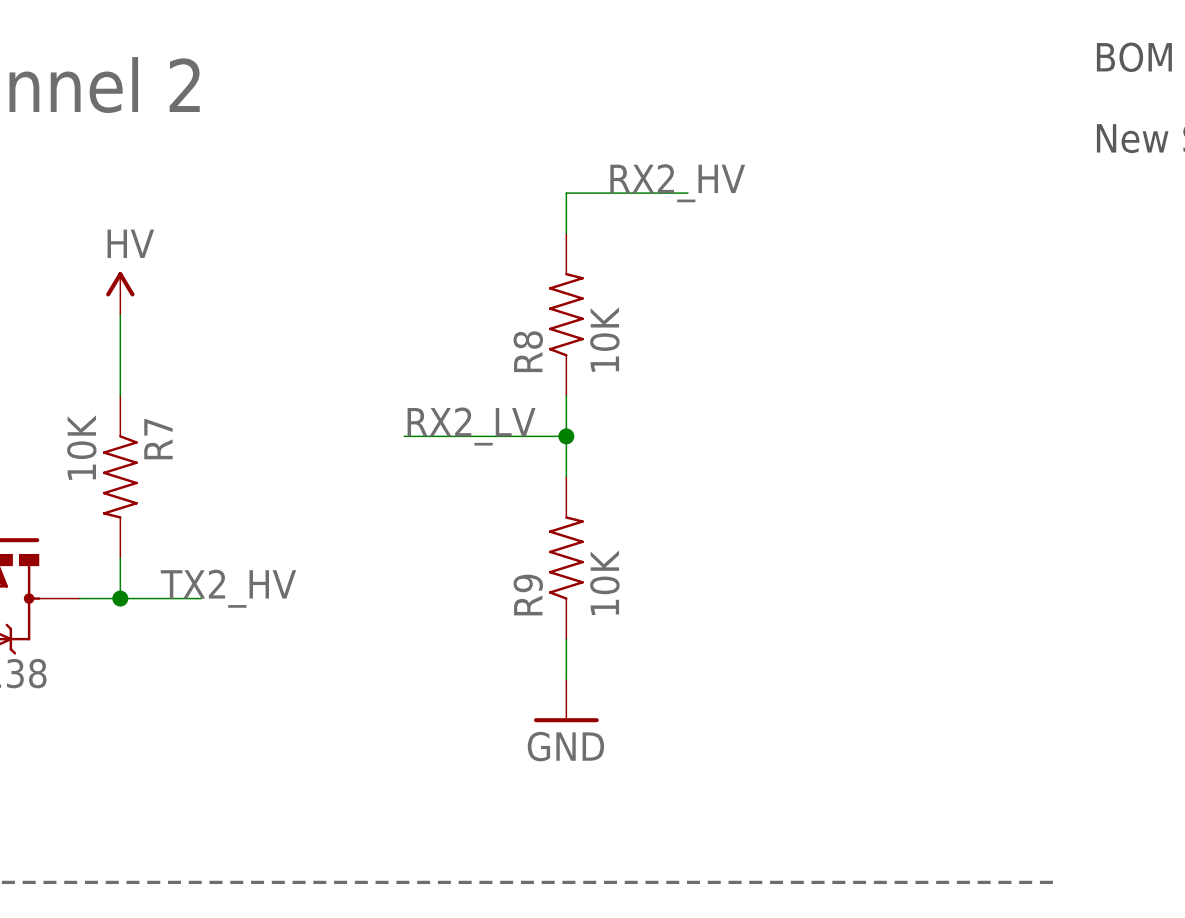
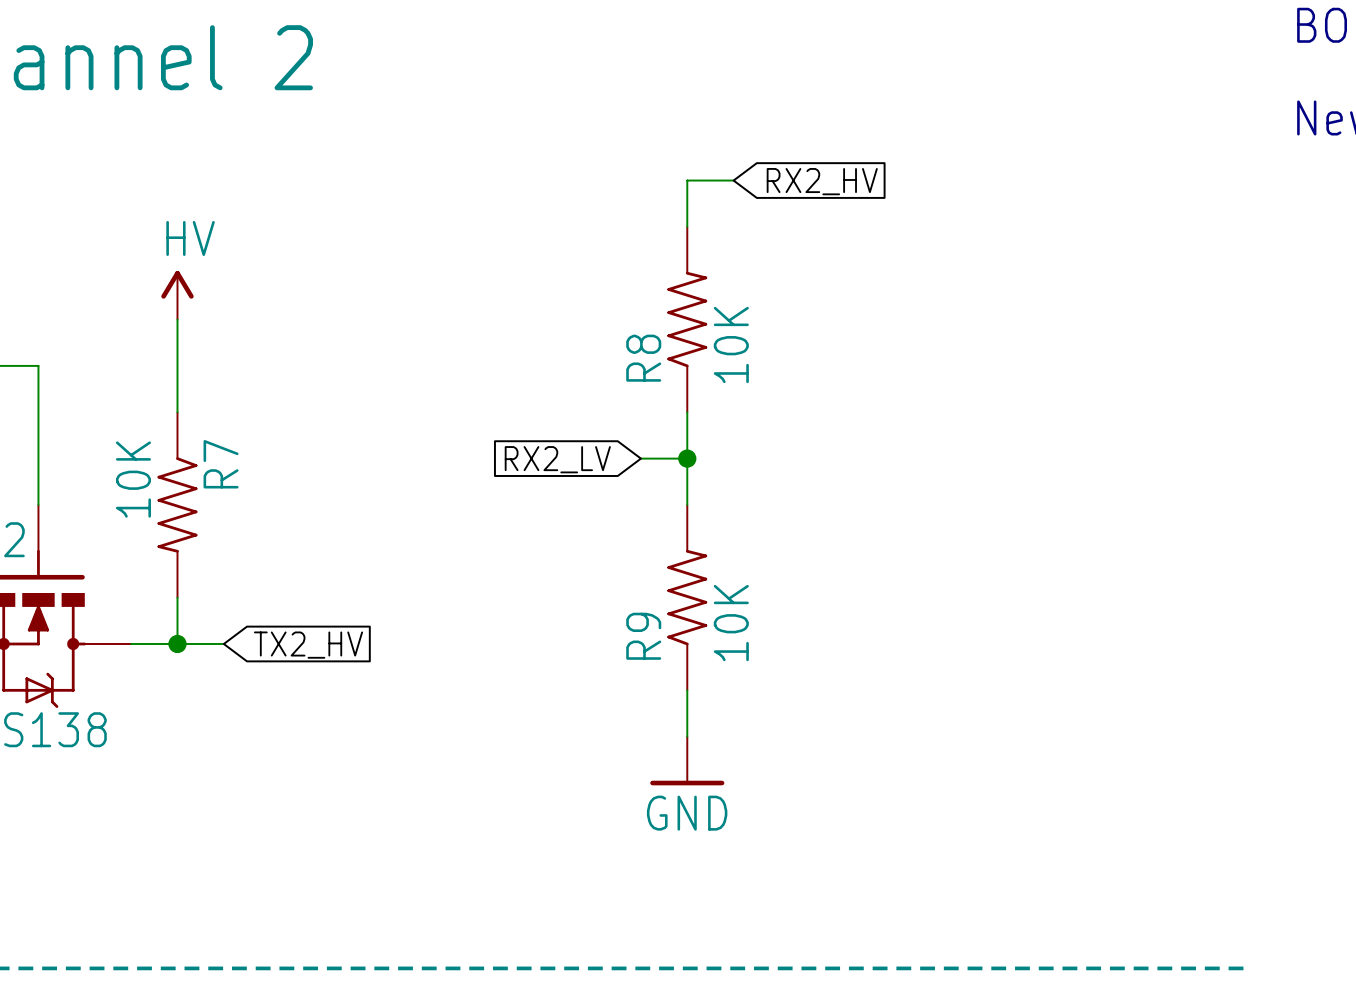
label: RX2_HV (677, 183) -> none
wire: (606, 193) (687, 193) -> none
global label: none -> RX2_HV (822, 181)
label: RX2_LV (471, 426) -> none
wire: (404, 436) (525, 436) -> none
global label: none -> RX2_LV (557, 459)
label: TX2_HV (228, 588) -> none
wire: (160, 598) (201, 598) -> none
global label: none -> TX2_HV (308, 645)

